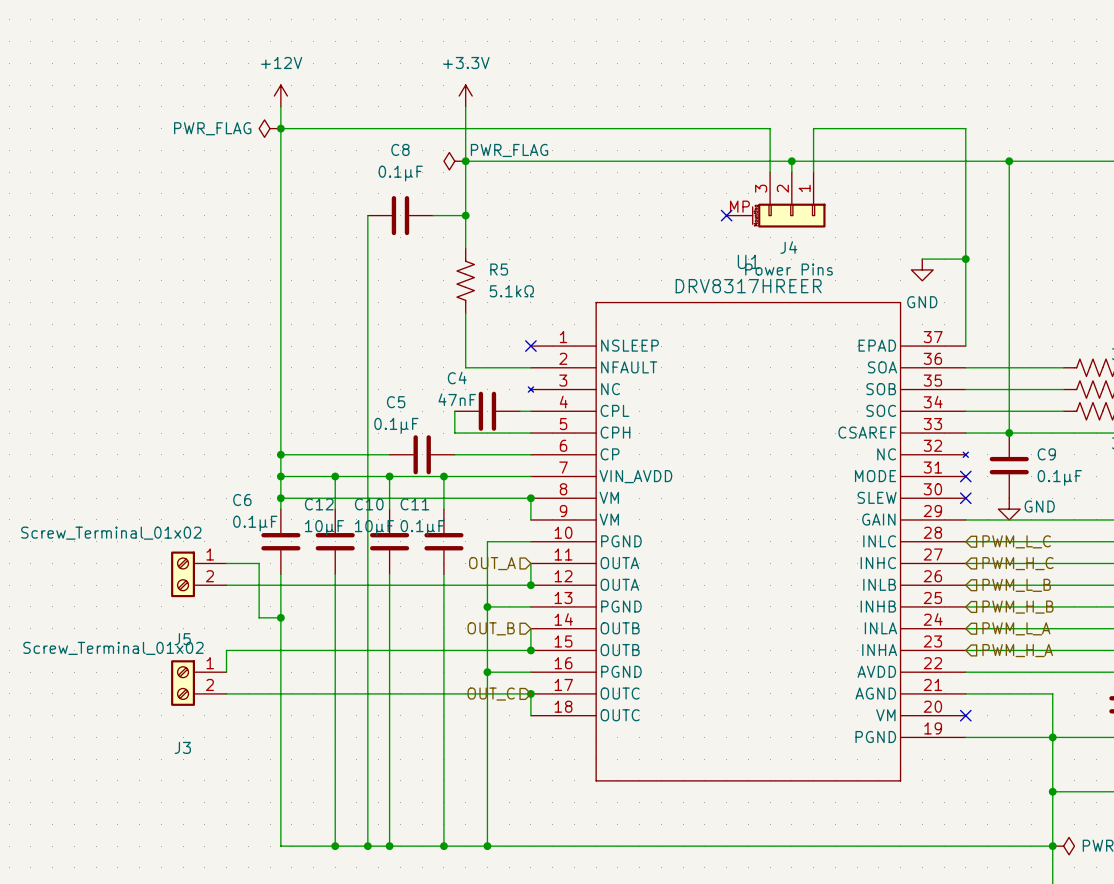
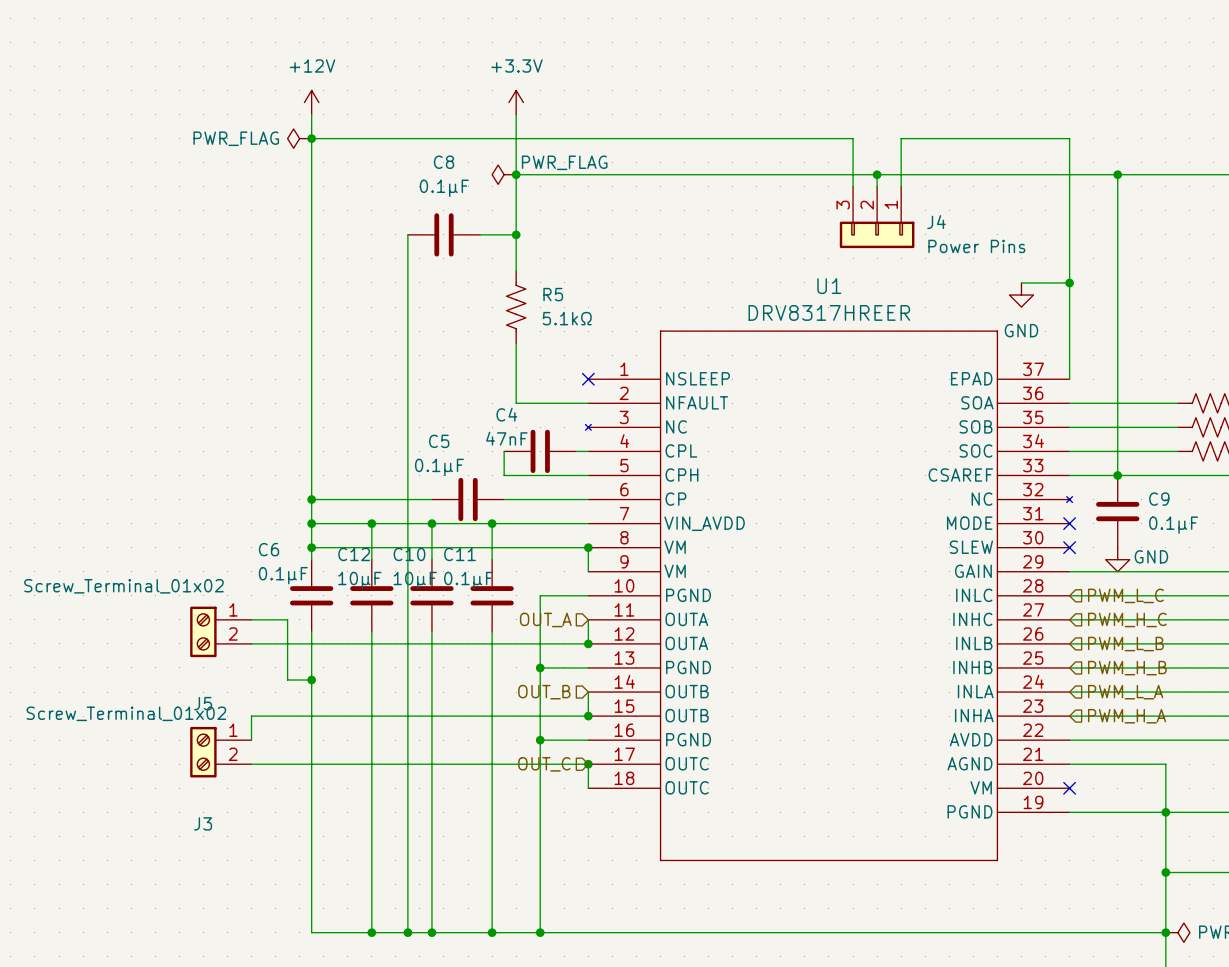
J4 symbol: [726, 172, 826, 228] -> [839, 186, 915, 249]
no-connect mark: (726, 215) -> none
J4 name position: J4 (788, 247) -> J4 (936, 222)
J4 value position: Power Pins (789, 269) -> Power Pins (976, 246)

